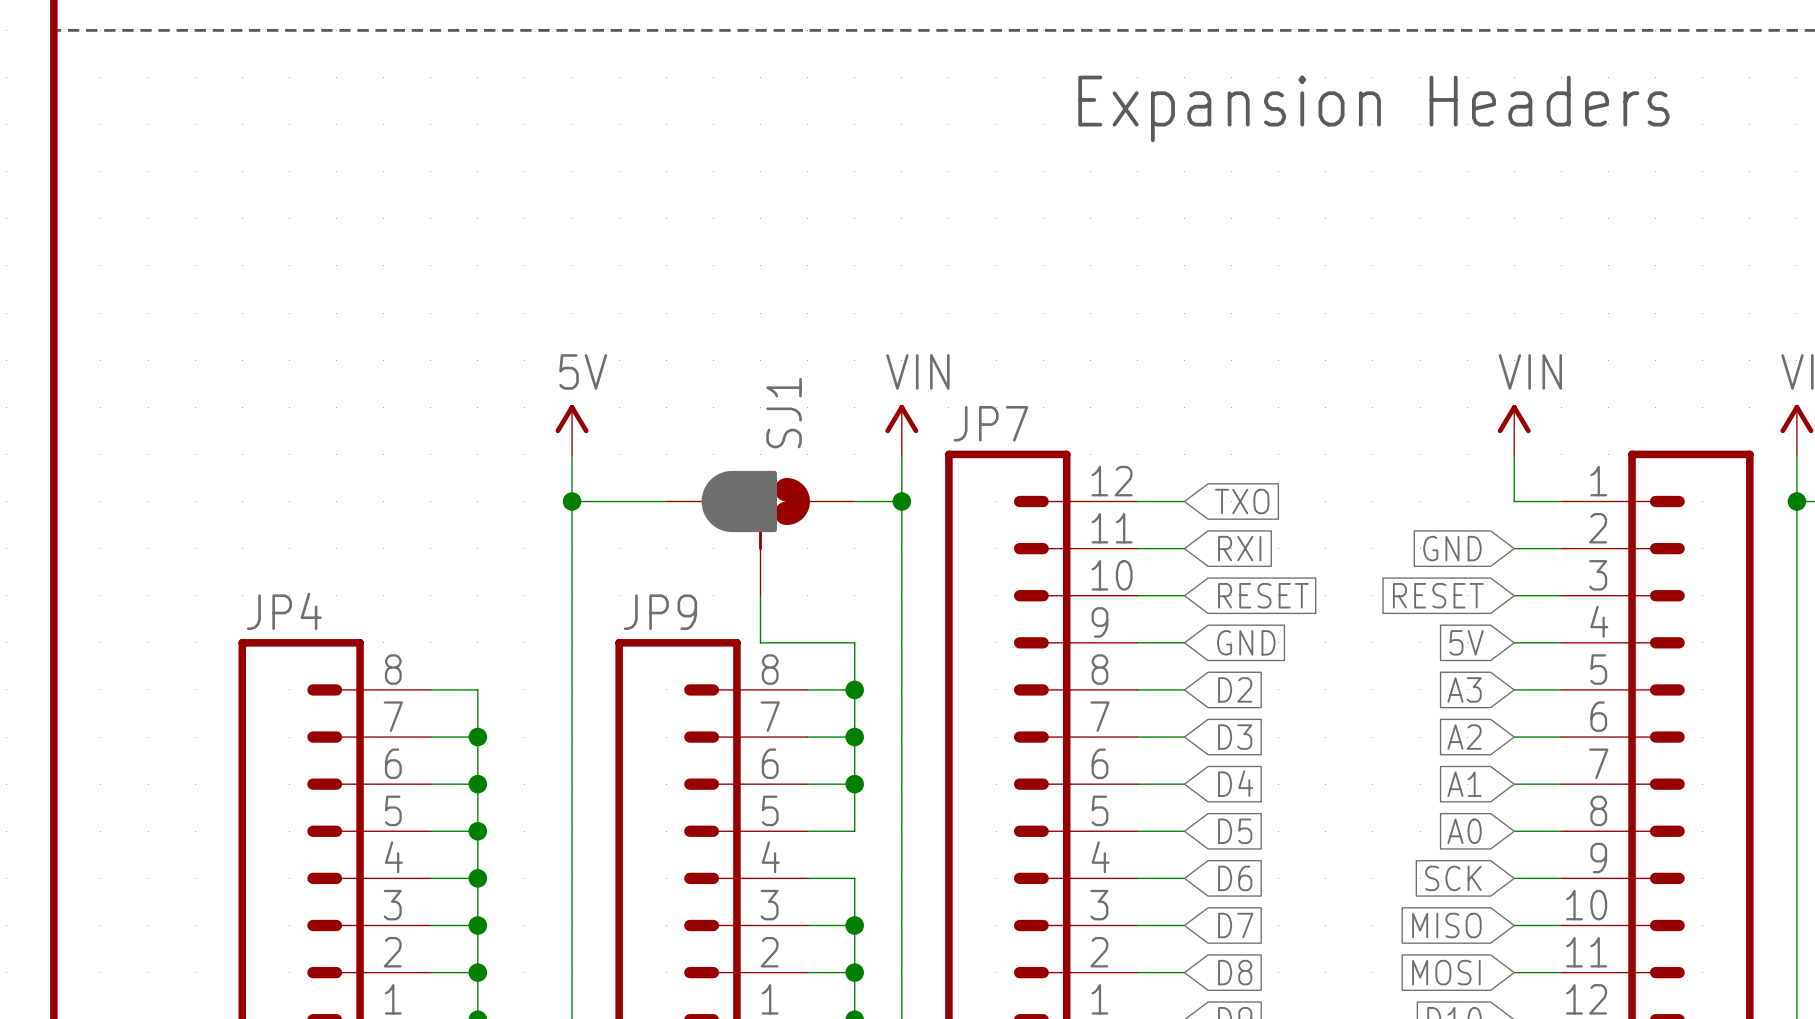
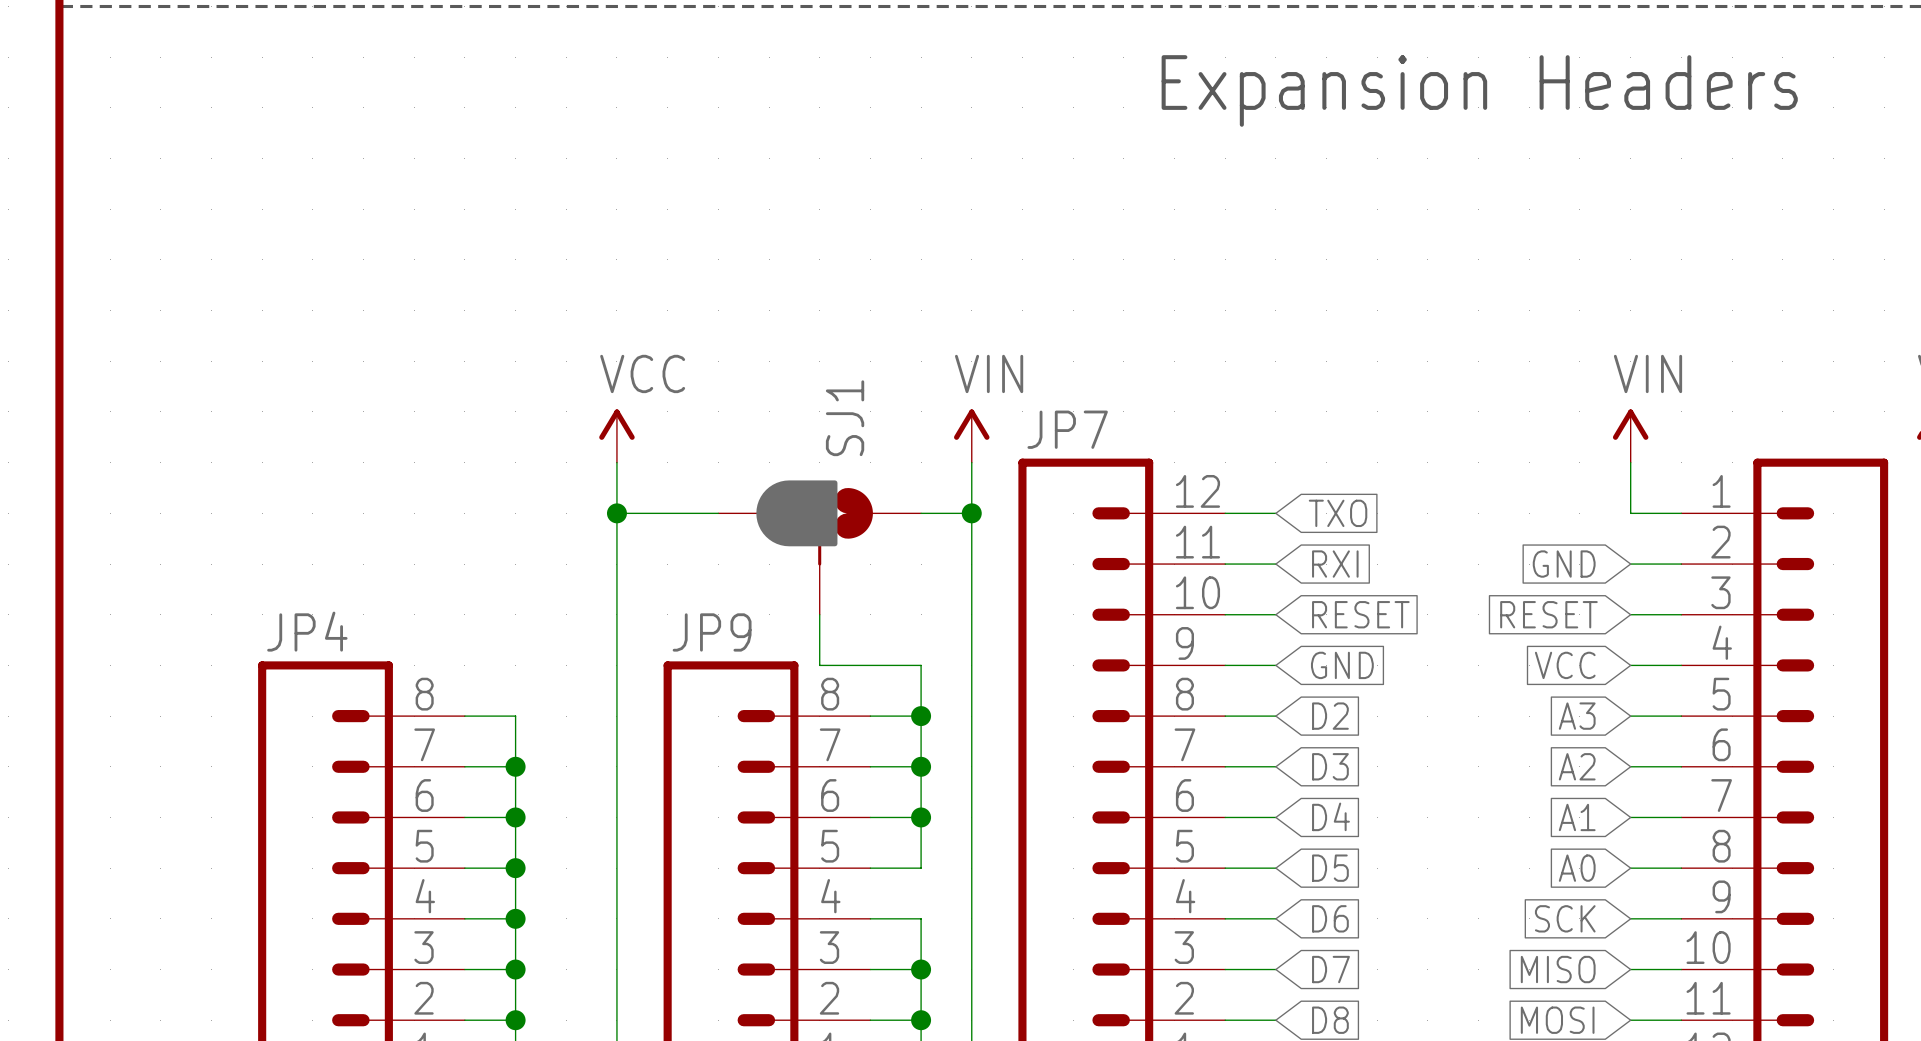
power symbol: 5V (572, 429) -> VCC (616, 436)
global label: 5V (1466, 642) -> VCC (1565, 665)

